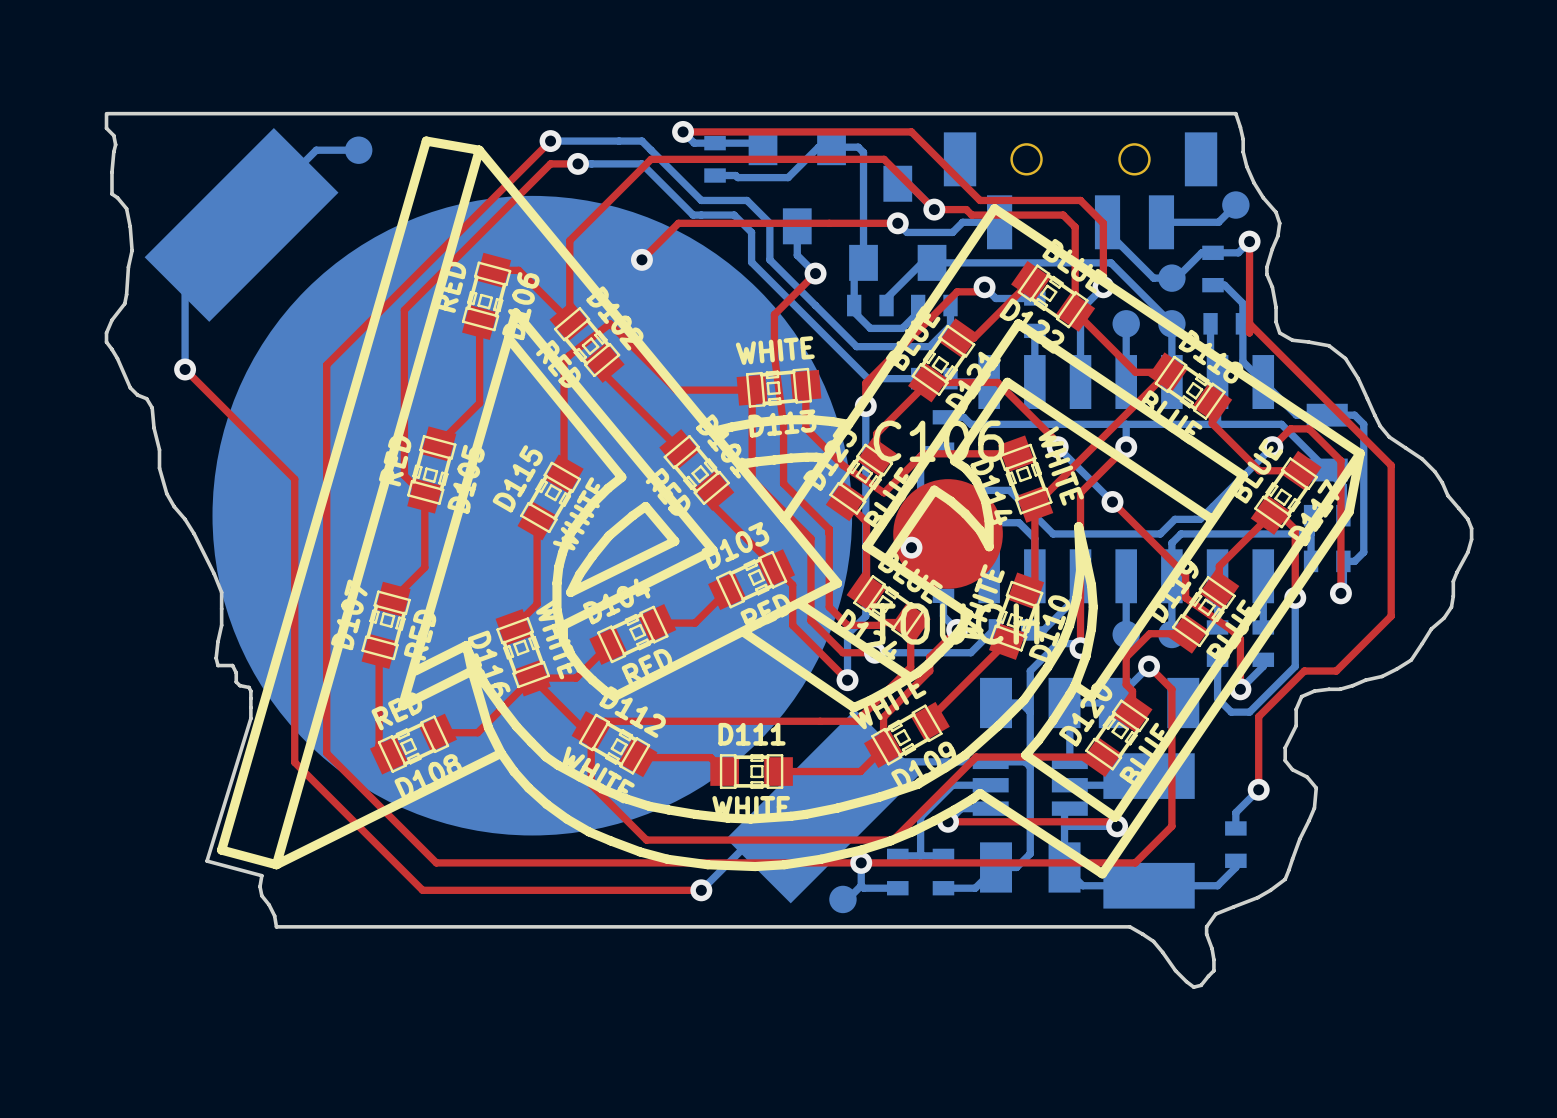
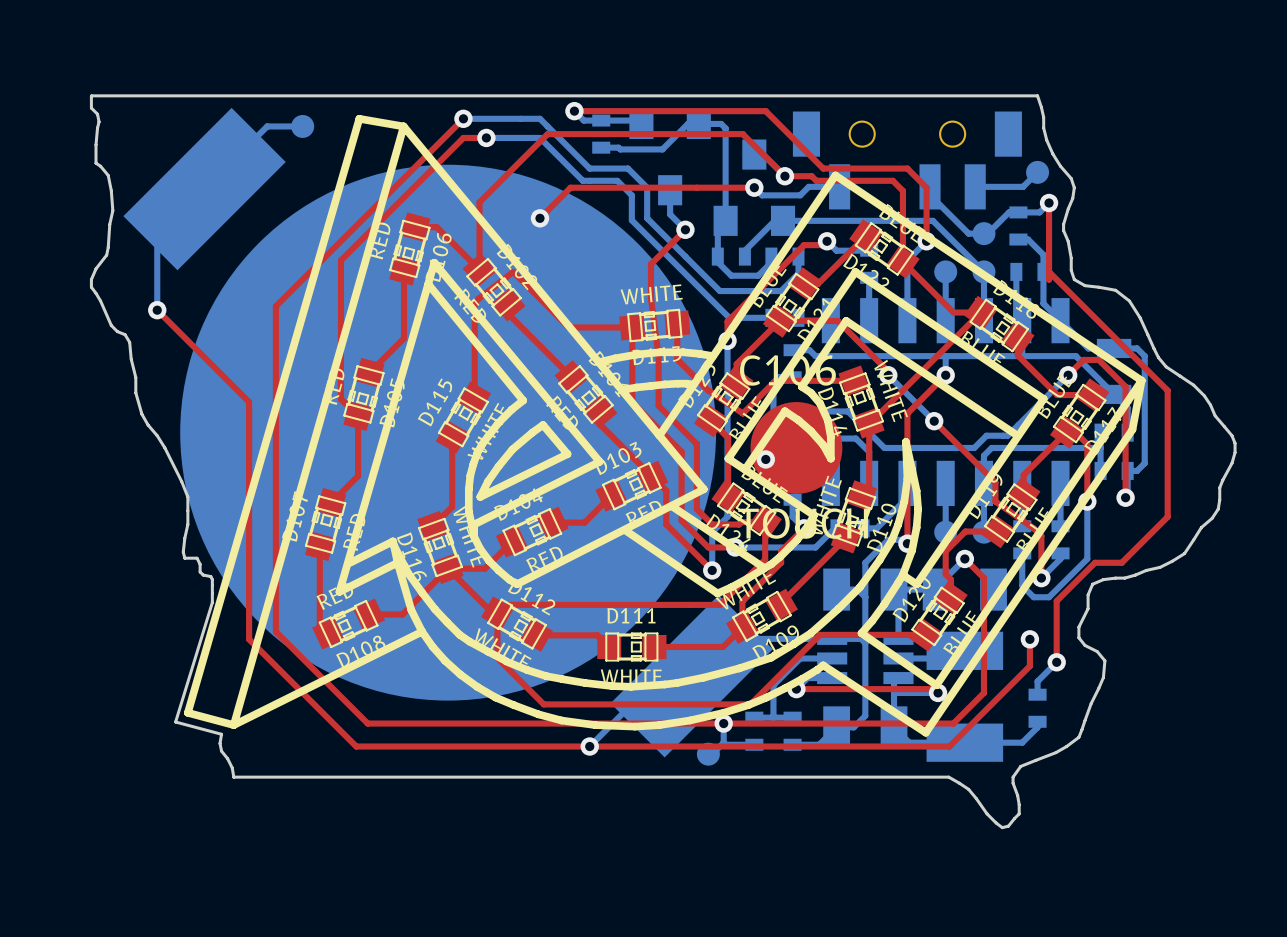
top track: none -> (1029, 639) (1029, 666) (949, 746) (589, 746)
via: none -> (1029, 639)

